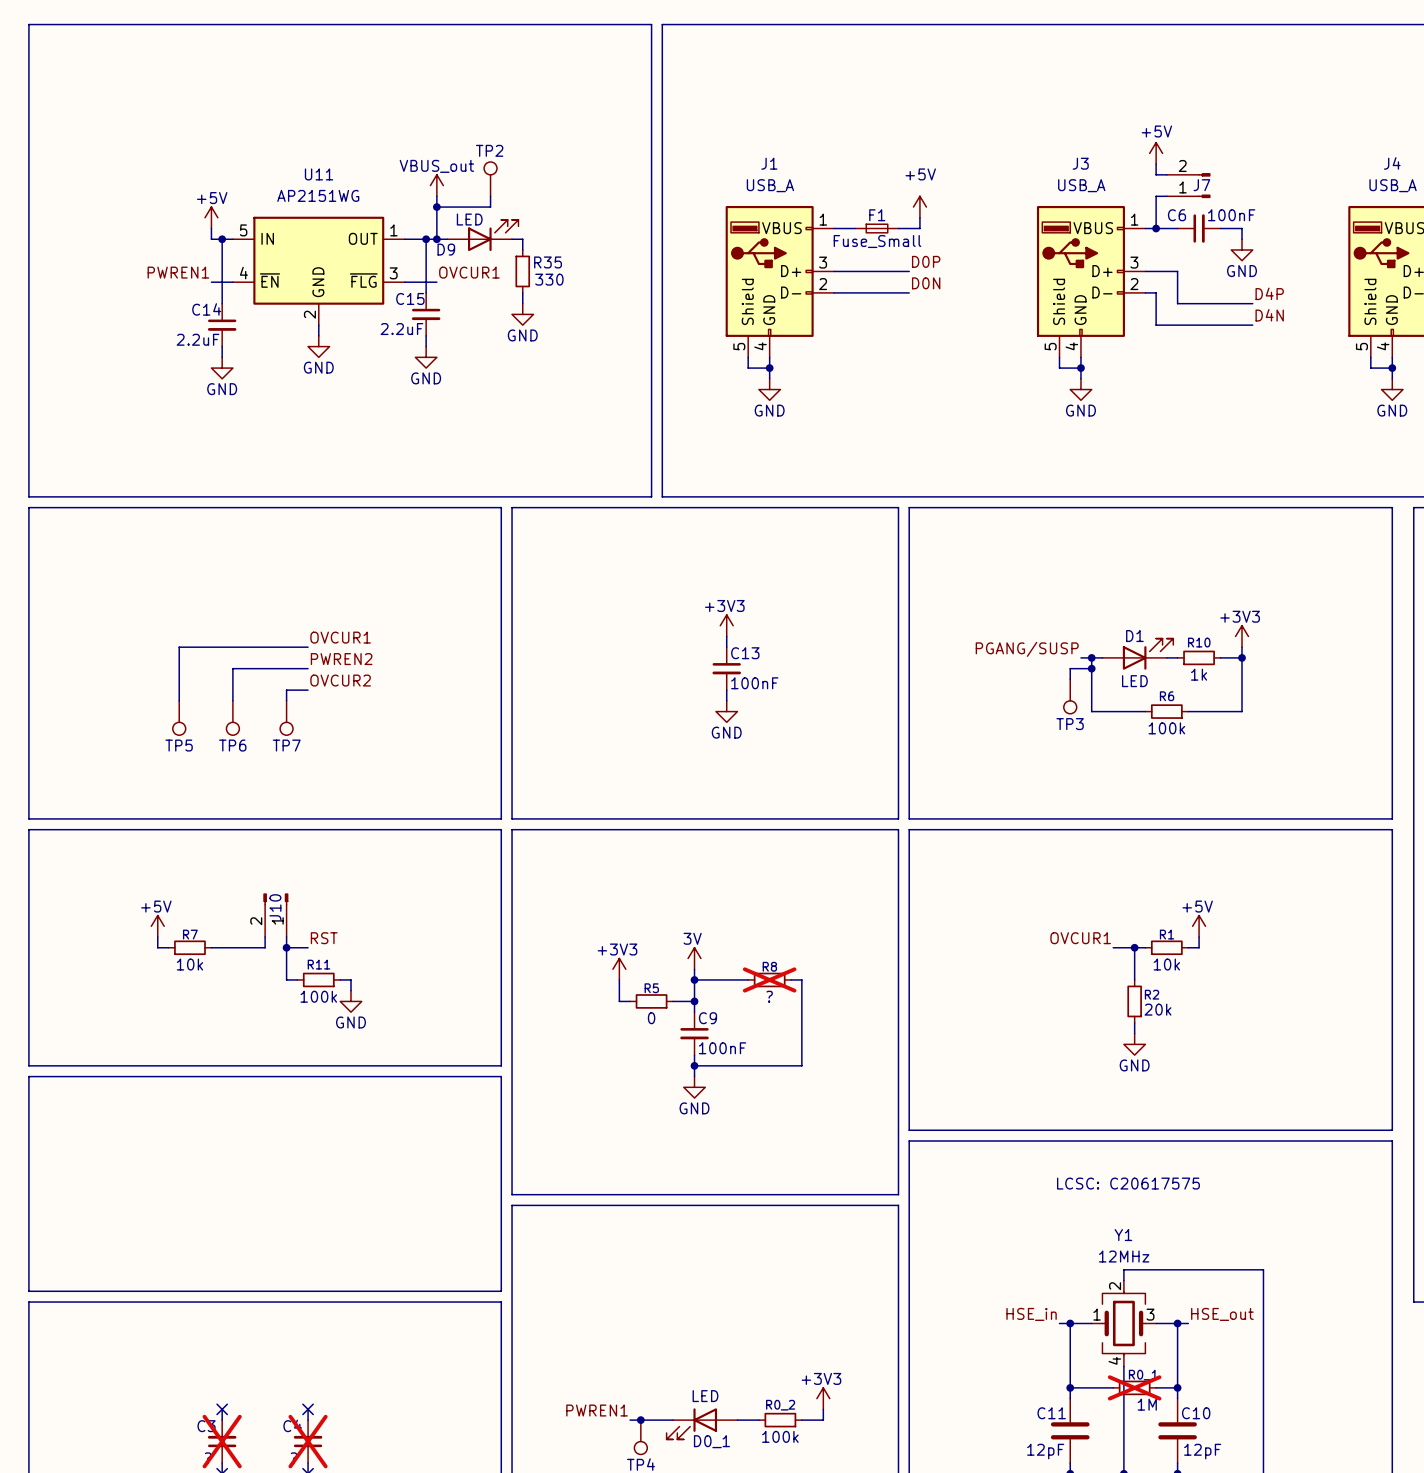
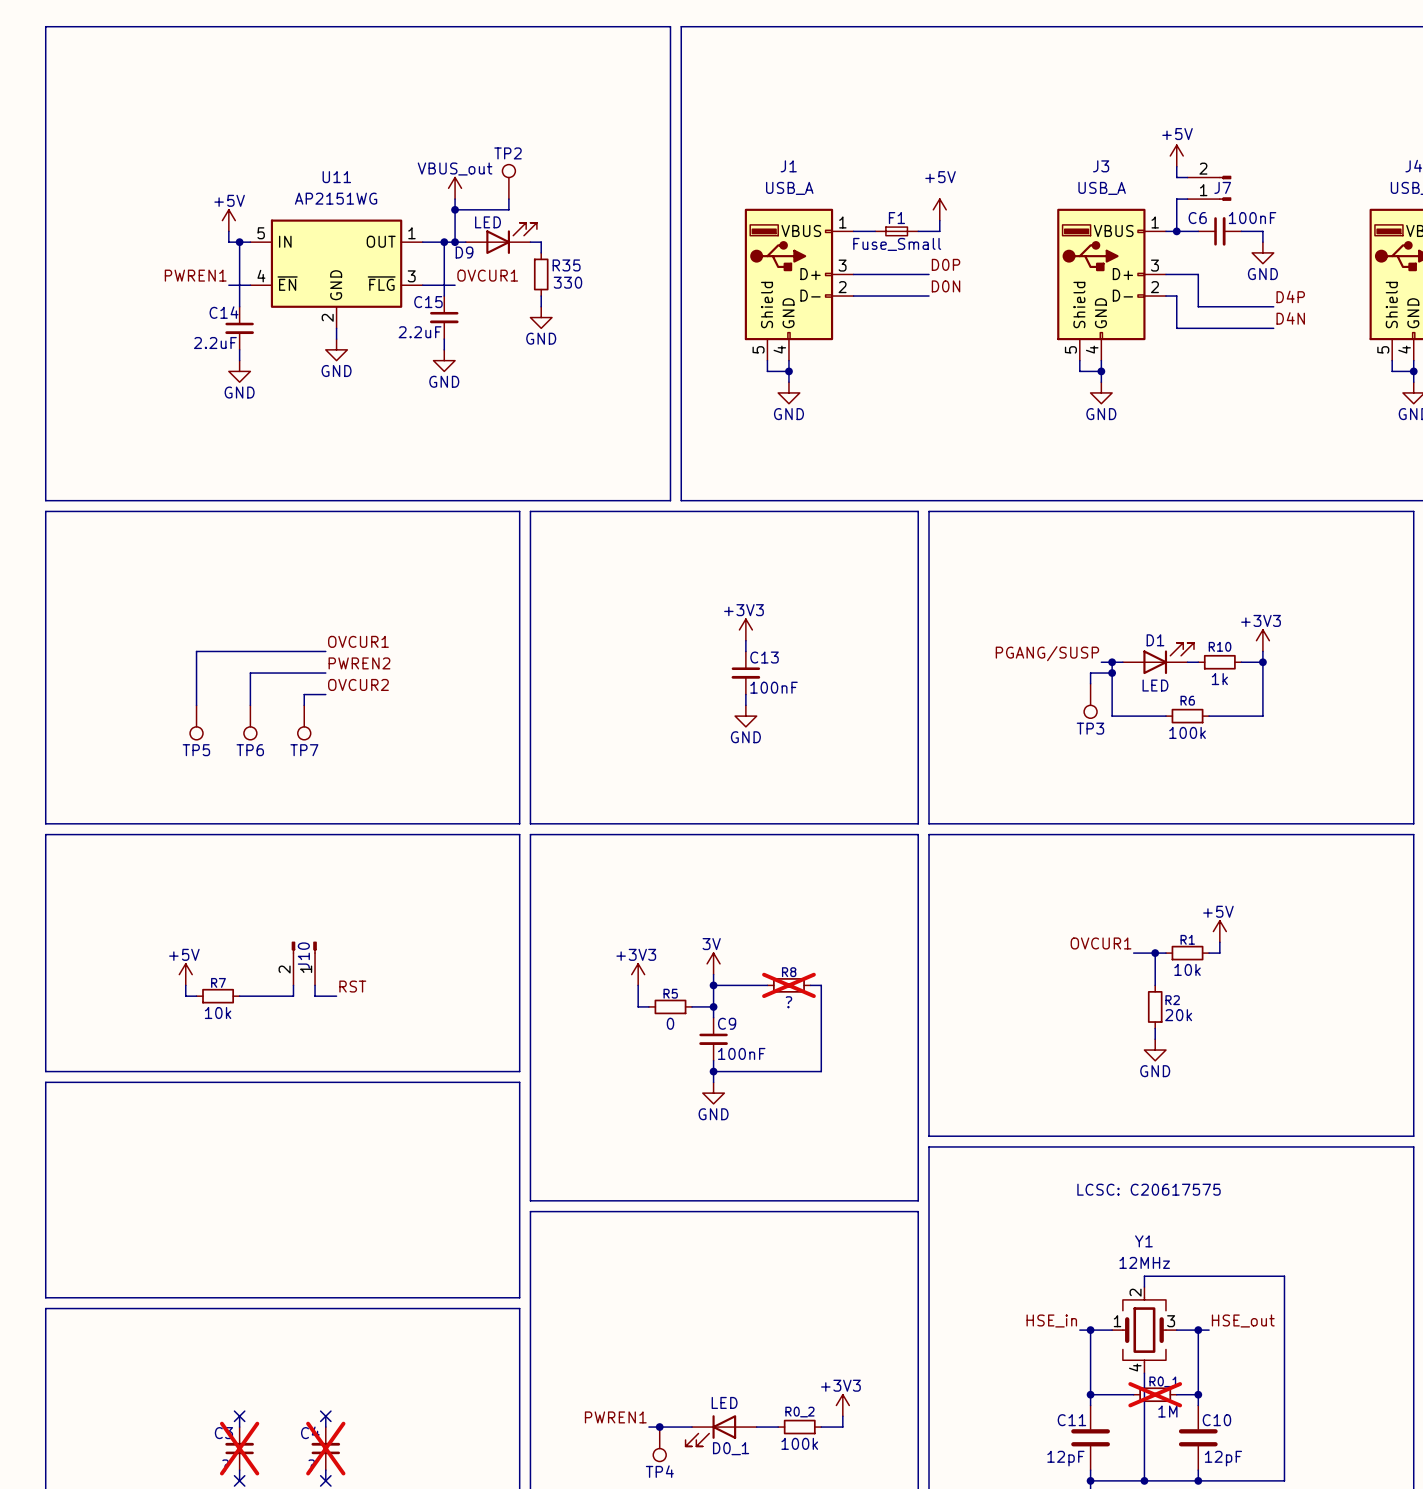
J10 position: (275, 915) -> (304, 963)
power symbol position: +5V (157, 926) -> +5V (185, 974)
wire: (157, 937) (157, 947) (168, 947) -> (185, 985) (185, 996) (196, 996)
wire: (265, 937) (265, 947) (211, 947) -> (293, 985) (293, 996) (239, 996)
wire: (286, 937) (286, 979) (297, 979) -> (336, 996) (315, 996) (315, 985)
label position: RST (324, 938) -> RST (352, 986)
R7 position: (189, 947) -> (218, 996)
wire: (286, 947) (308, 947) -> none
junction: (286, 947) -> none
R11: 100k (318, 979) -> none
wire: (340, 979) (350, 979) (350, 990) -> none
power symbol: GND (350, 1001) -> none

